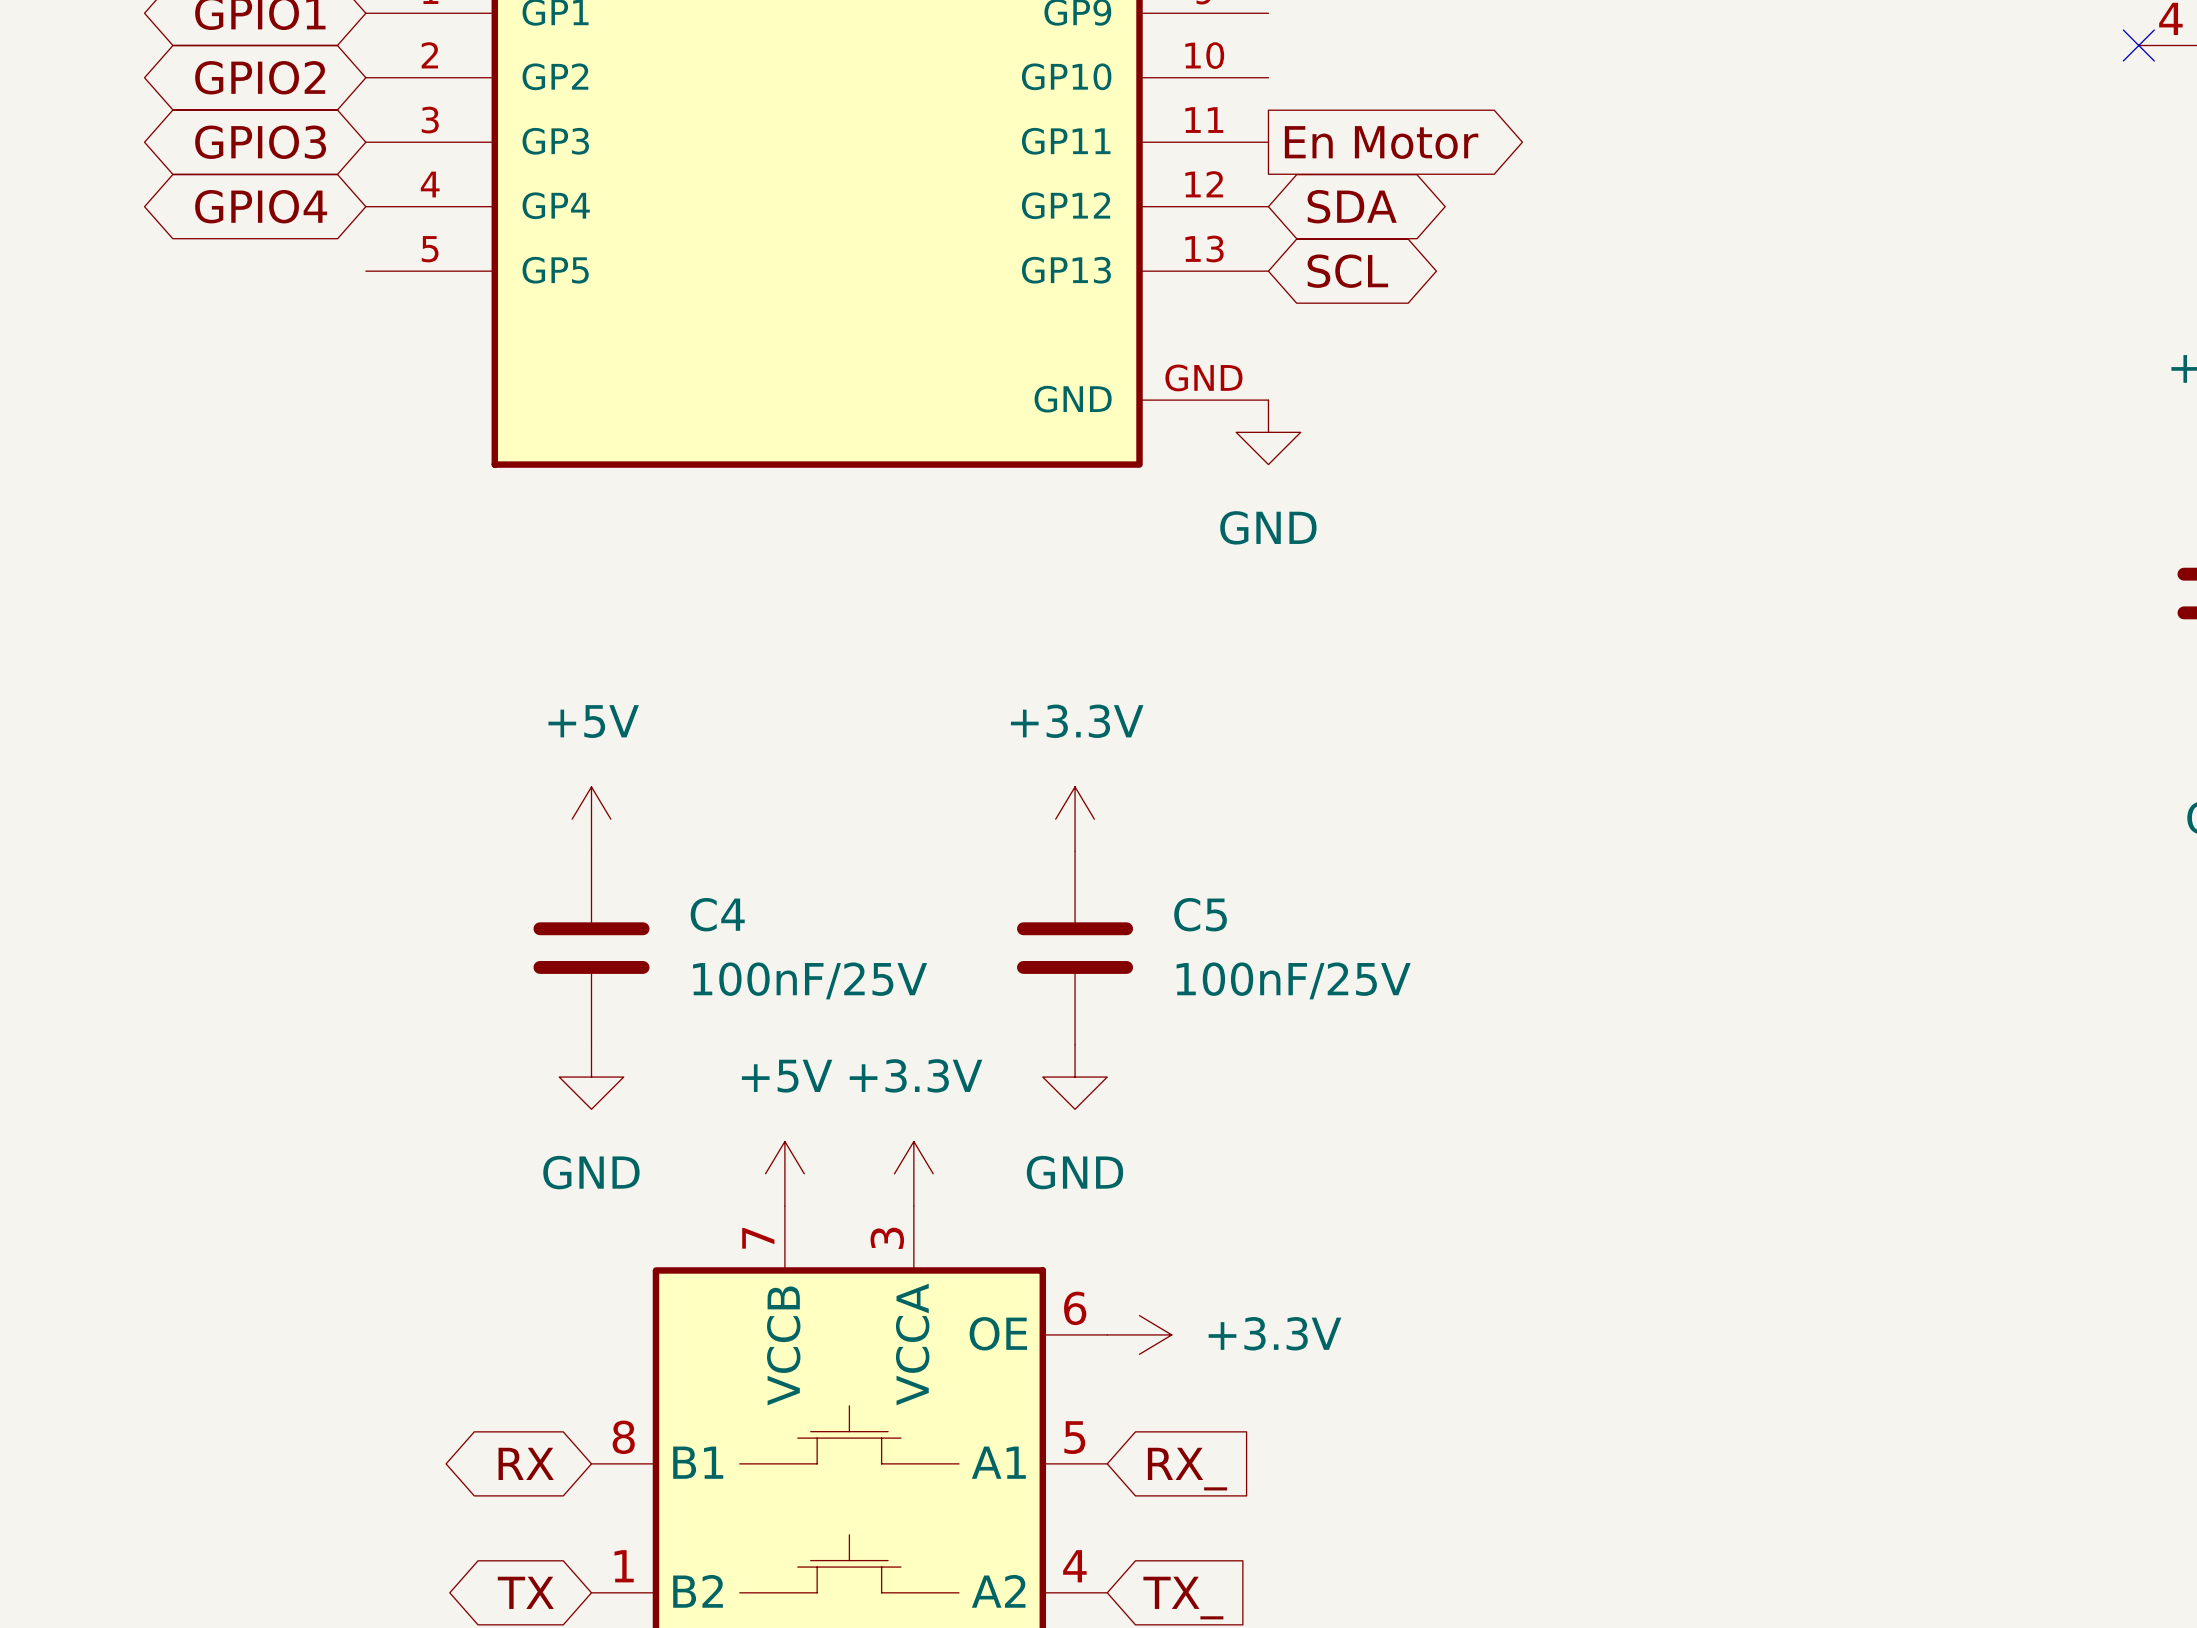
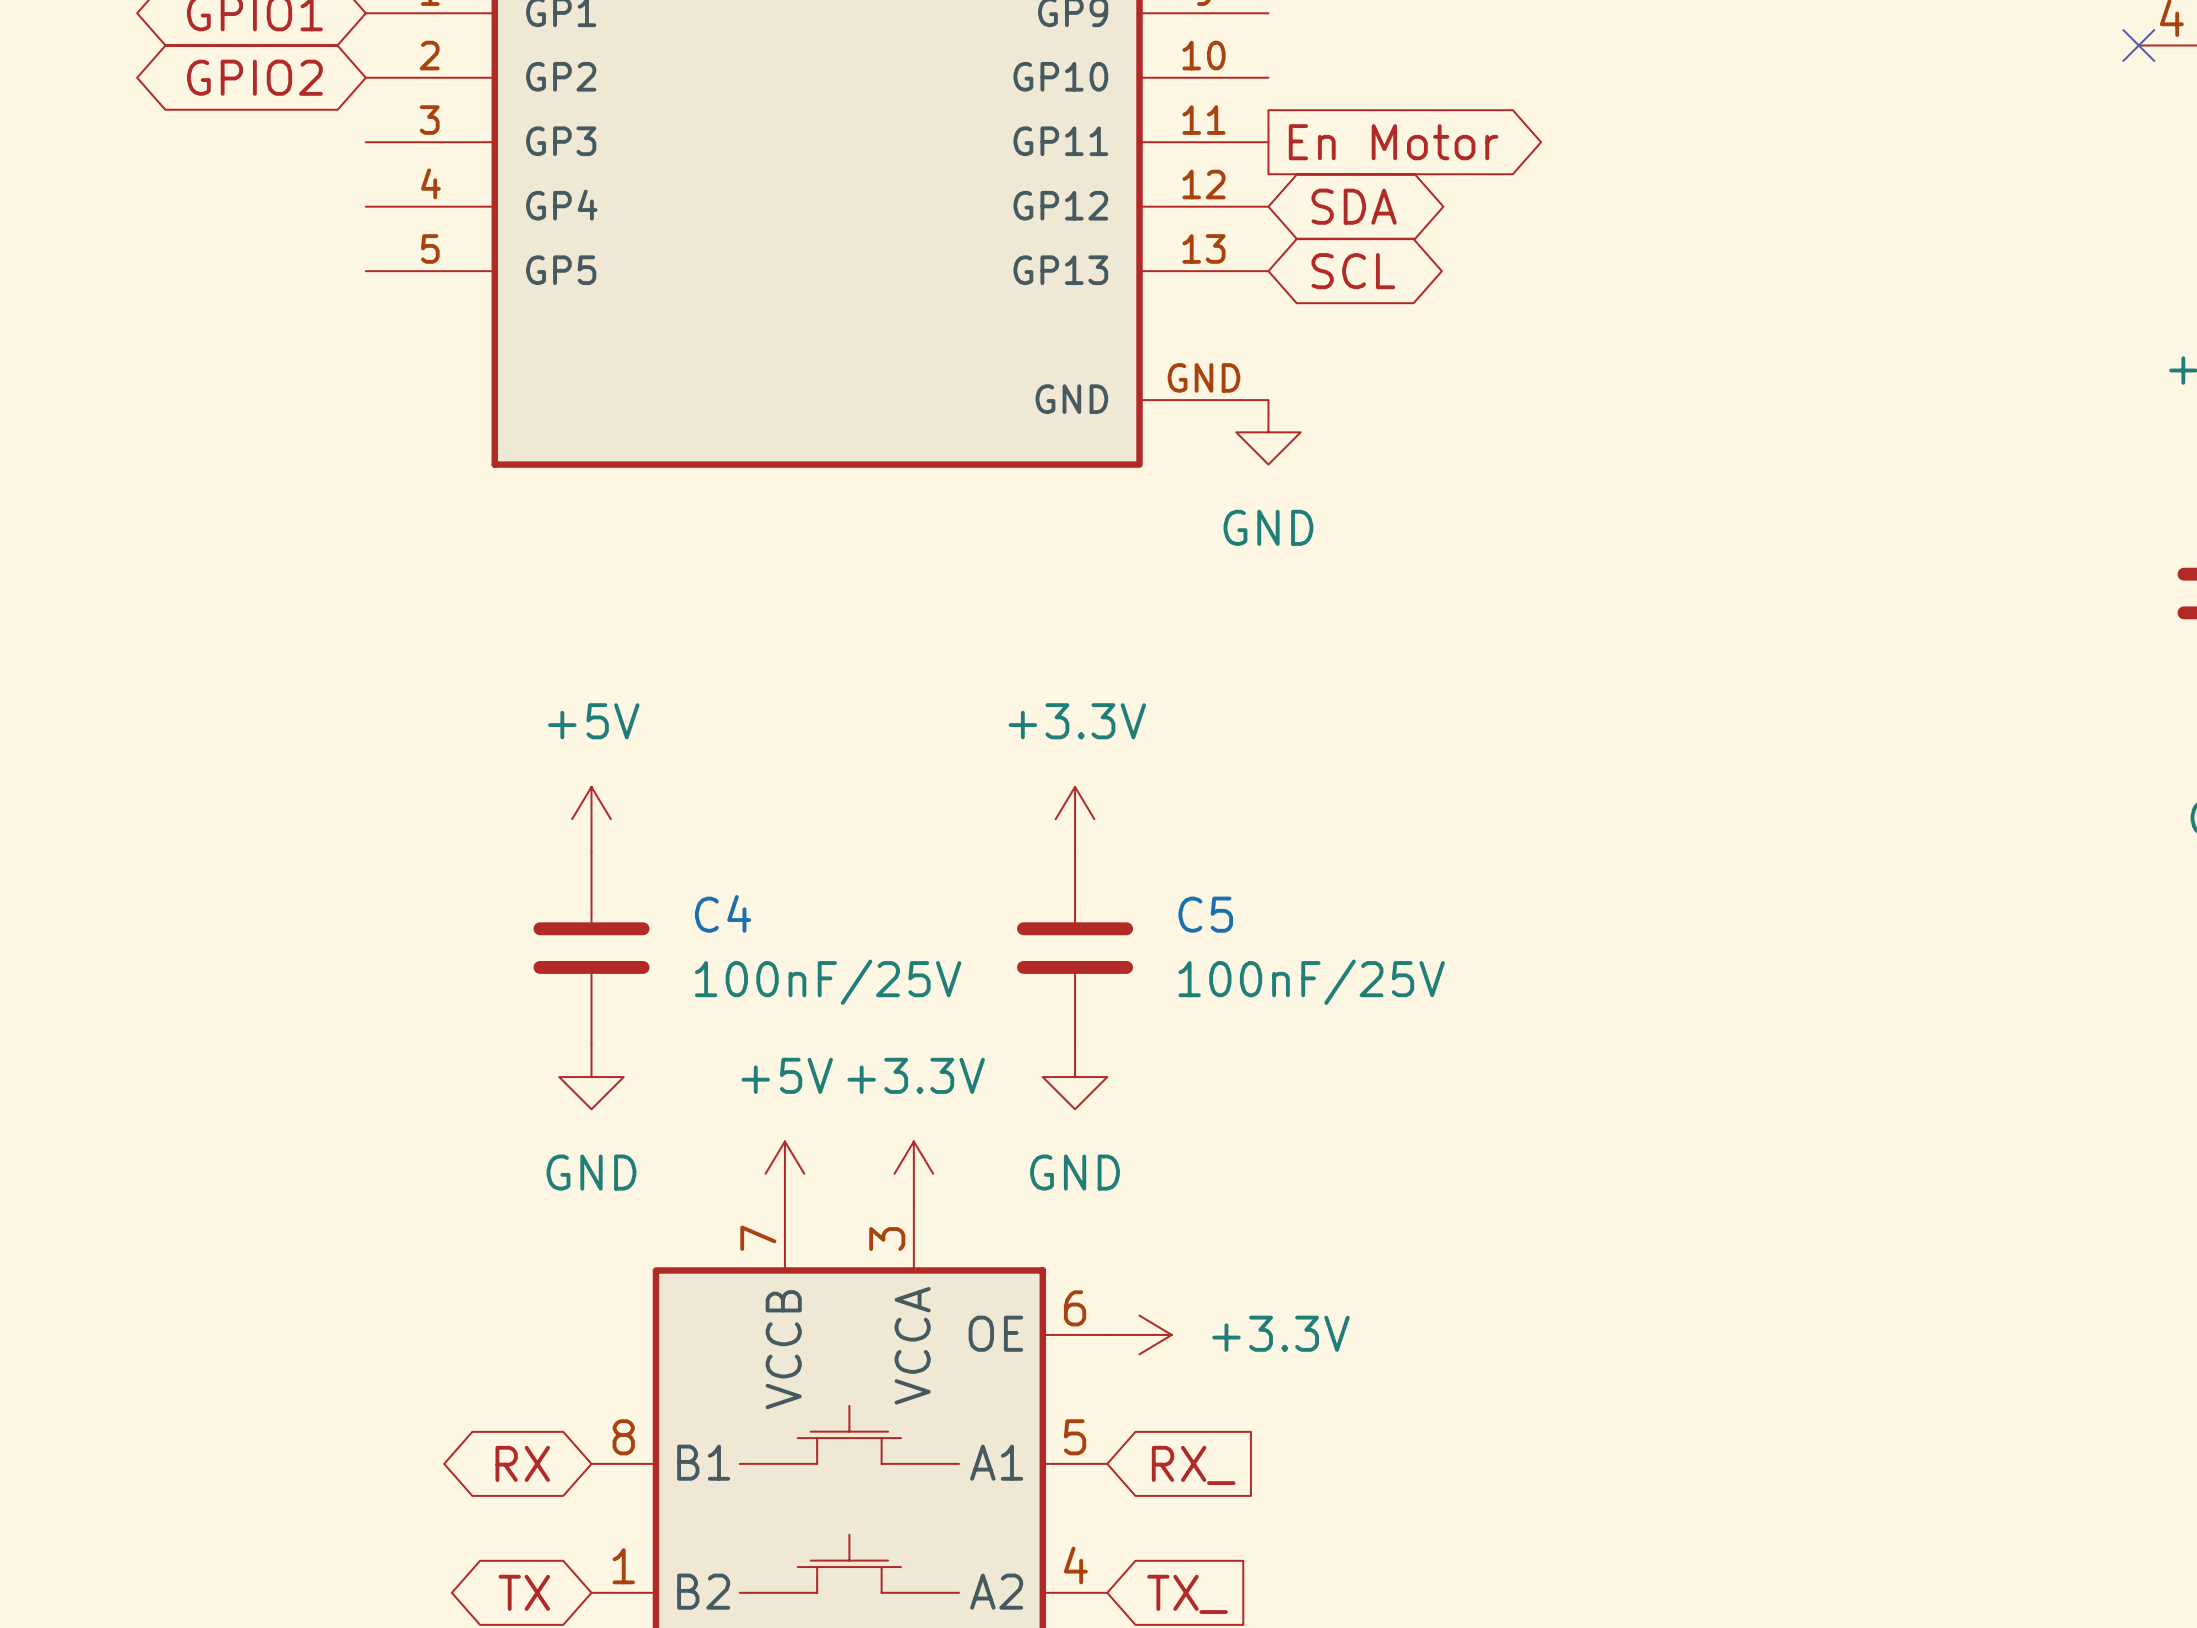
global label: GPIO3 (260, 142) -> none
global label: GPIO4 (261, 206) -> none

